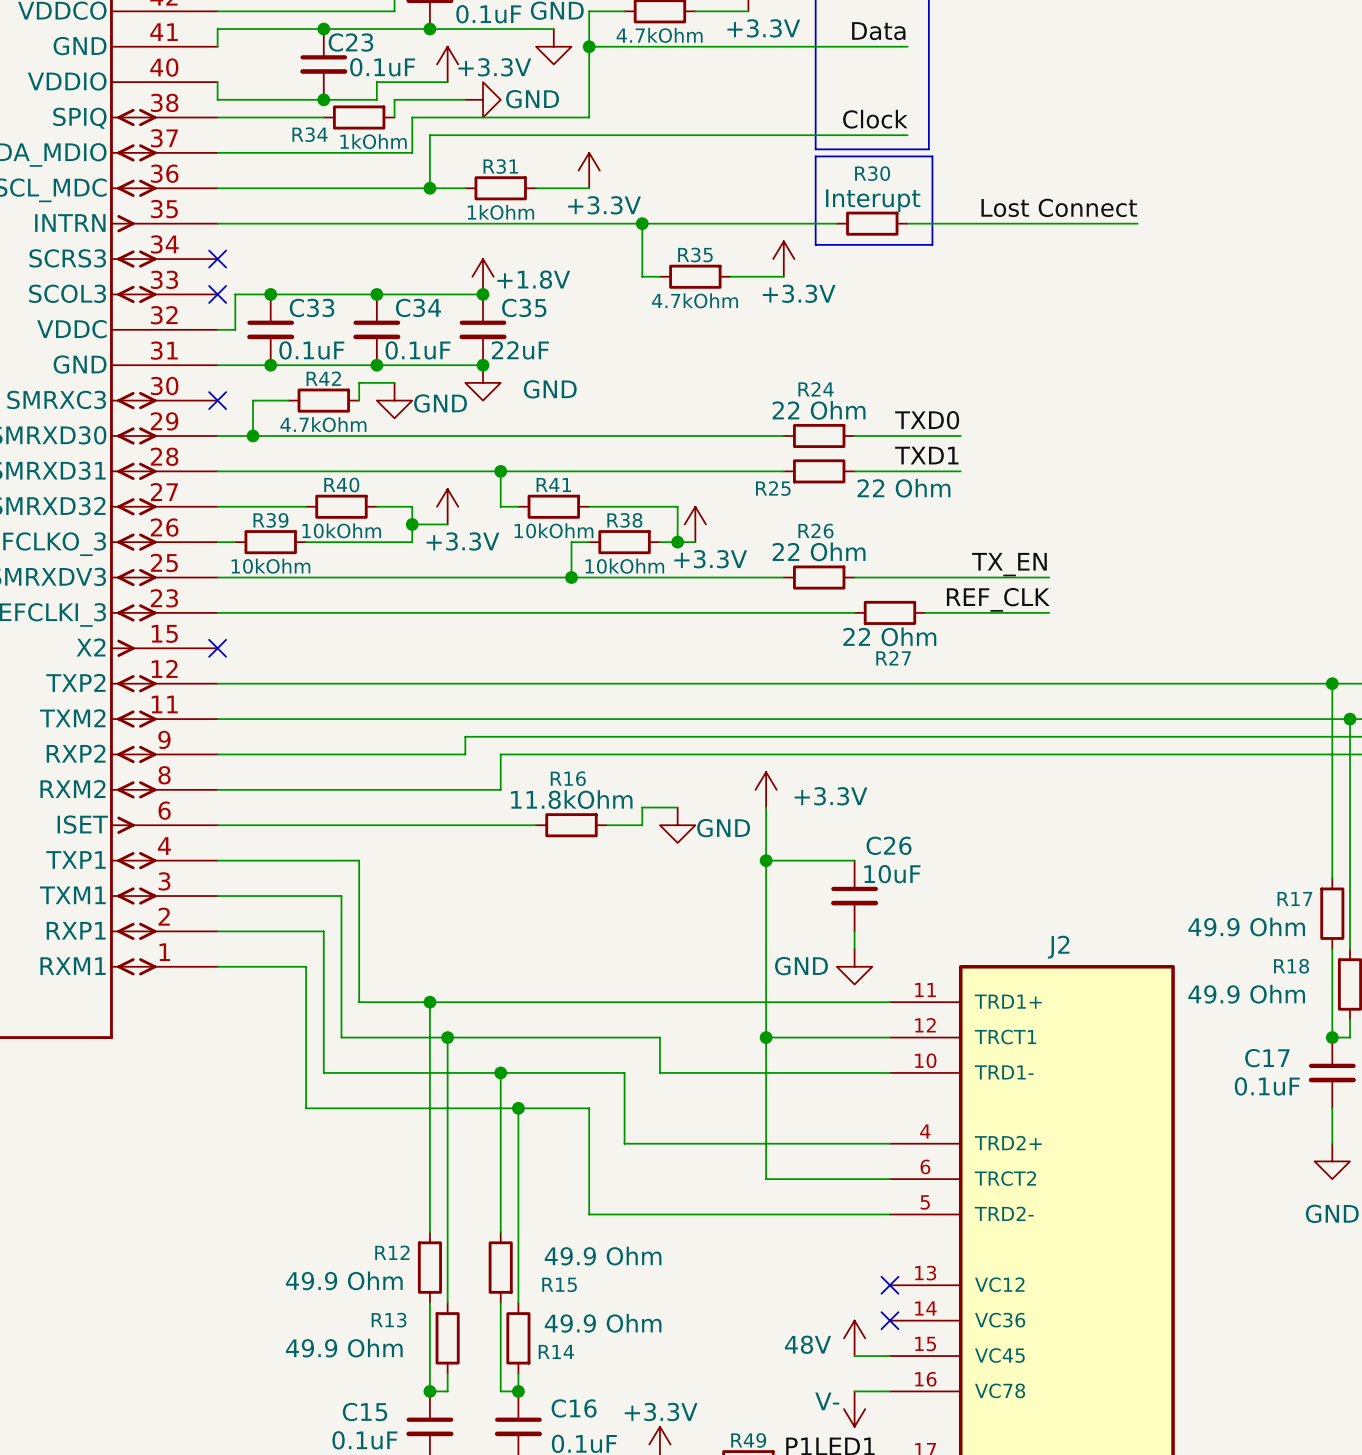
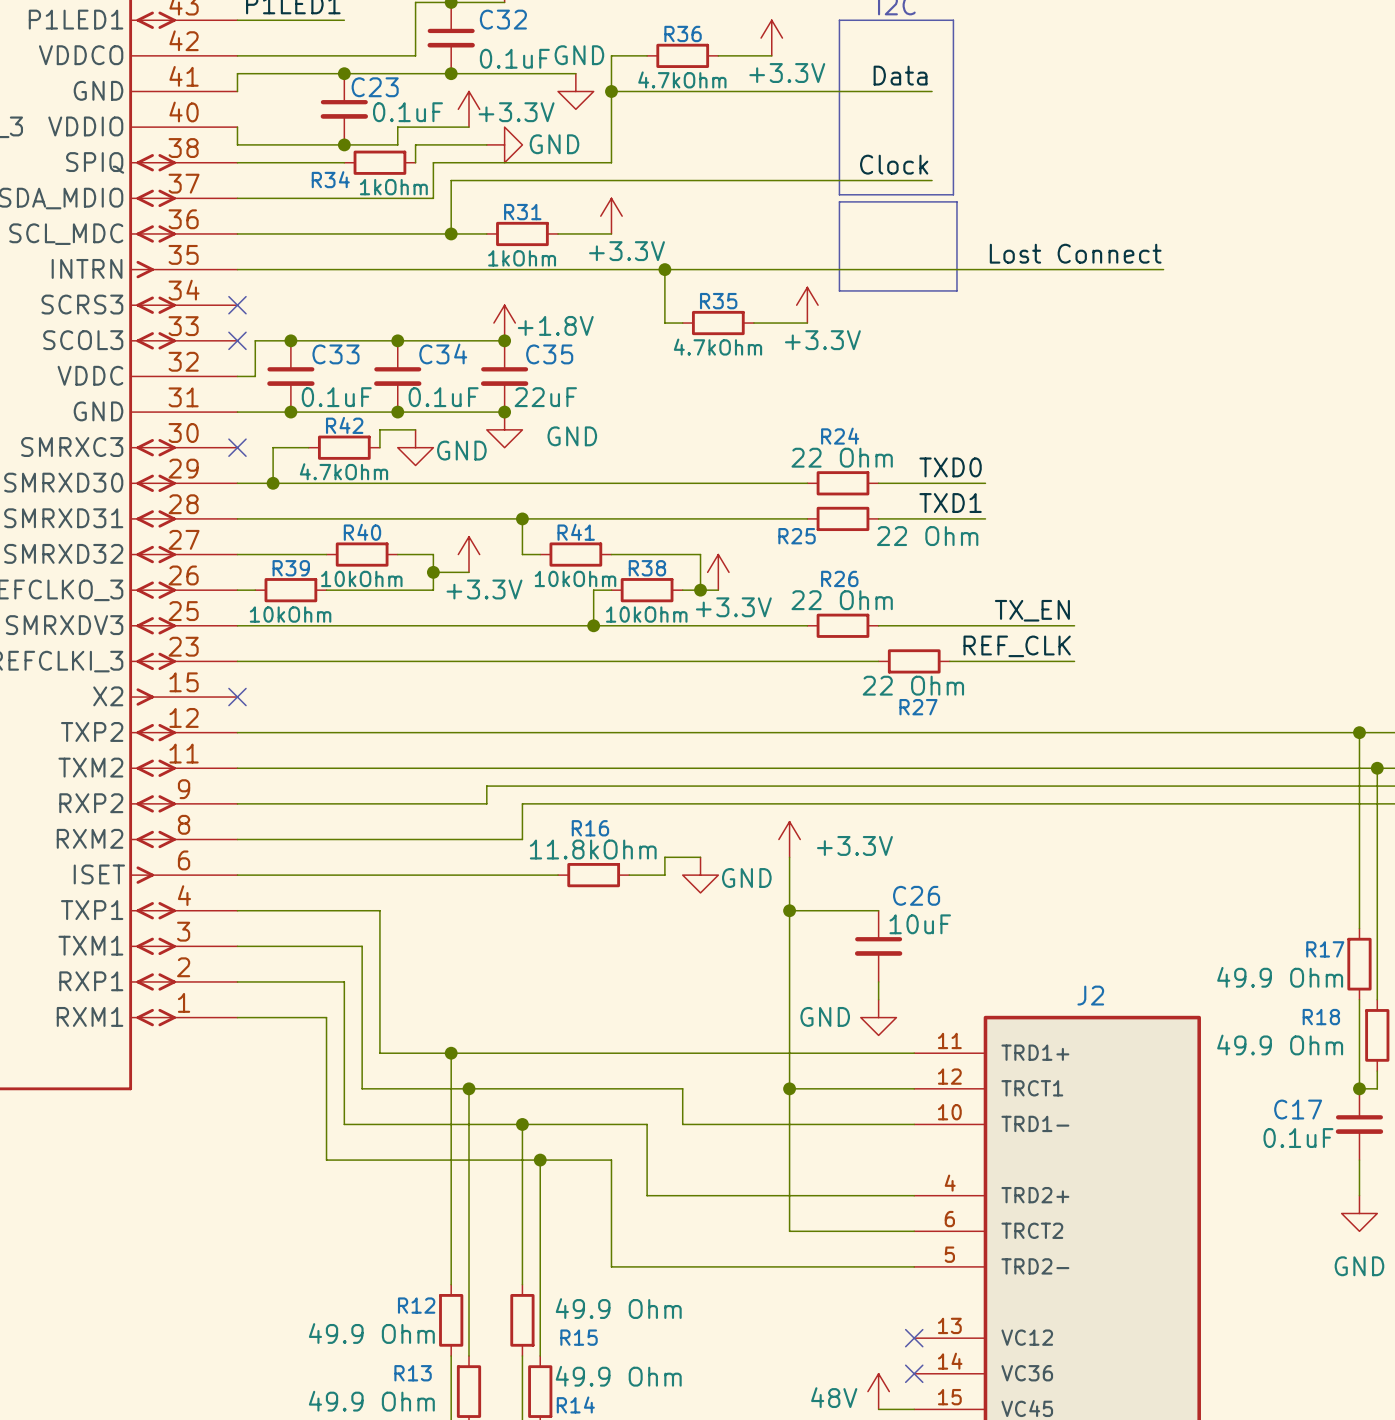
wire: none -> (860, 269) (932, 269)
R30: Interupt (872, 223) -> none

